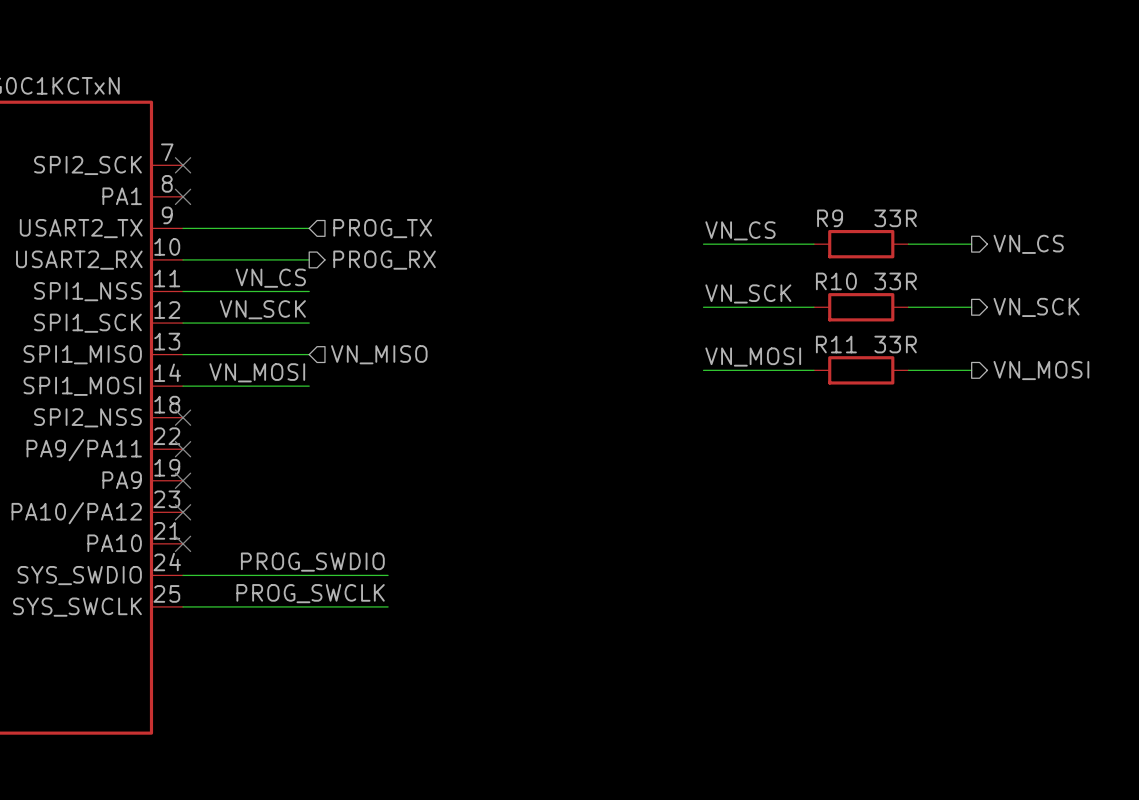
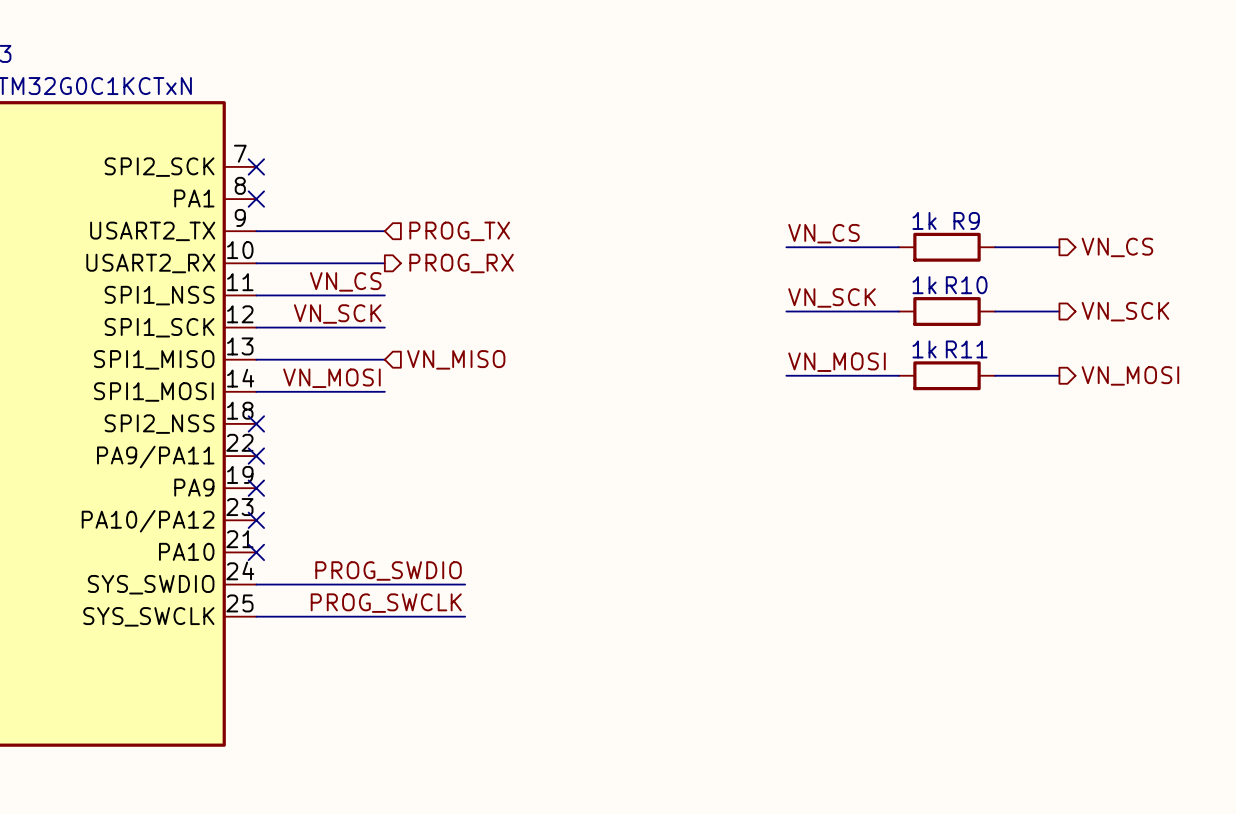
R9 name position: R9 (830, 218) -> R9 (966, 220)
R9 value: 33R (895, 218) -> 1k (924, 220)
R10 name position: R10 (836, 281) -> R10 (966, 285)
R10 value: 33R (895, 281) -> 1k (924, 285)
R11 name position: R11 (836, 344) -> R11 (966, 349)
R11 value: 33R (895, 344) -> 1k (924, 349)

